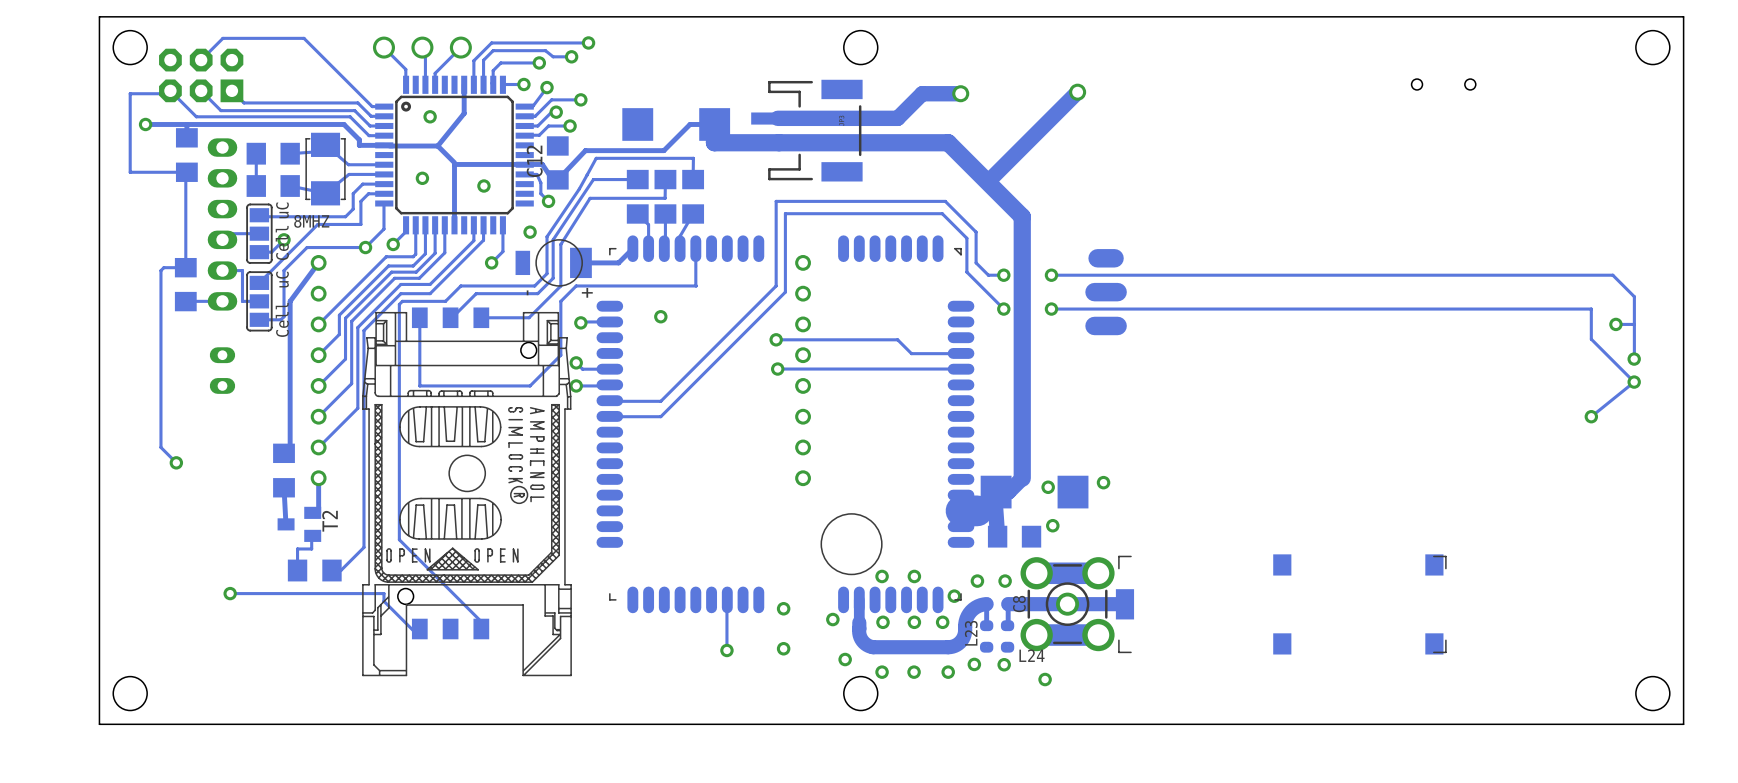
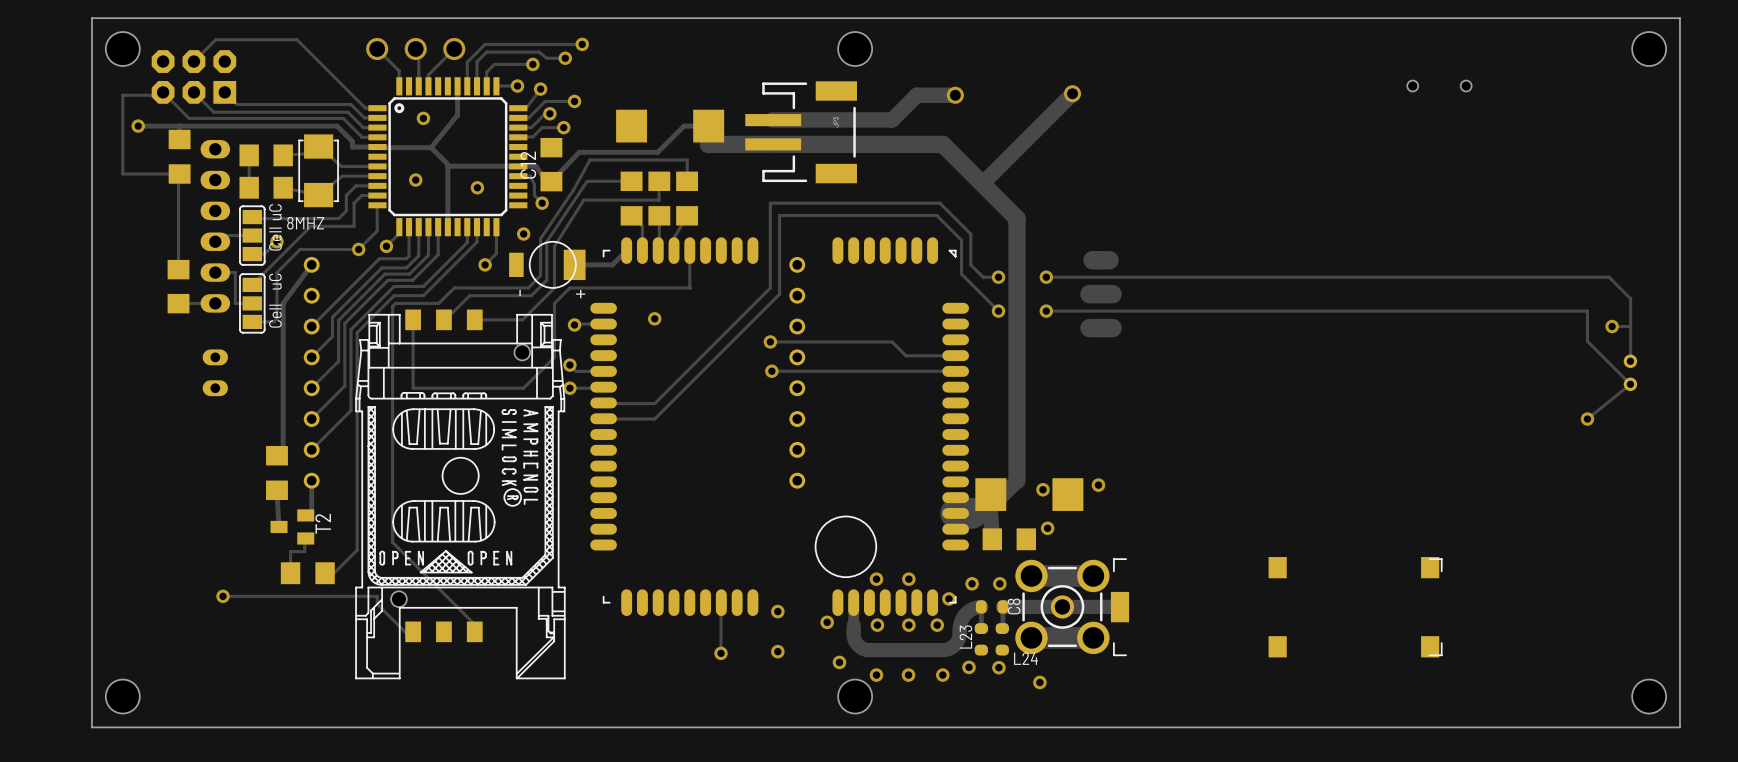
track: (185, 267) (163, 267) (160, 270) (160, 447) (176, 462) -> none
via: (176, 462) -> none

